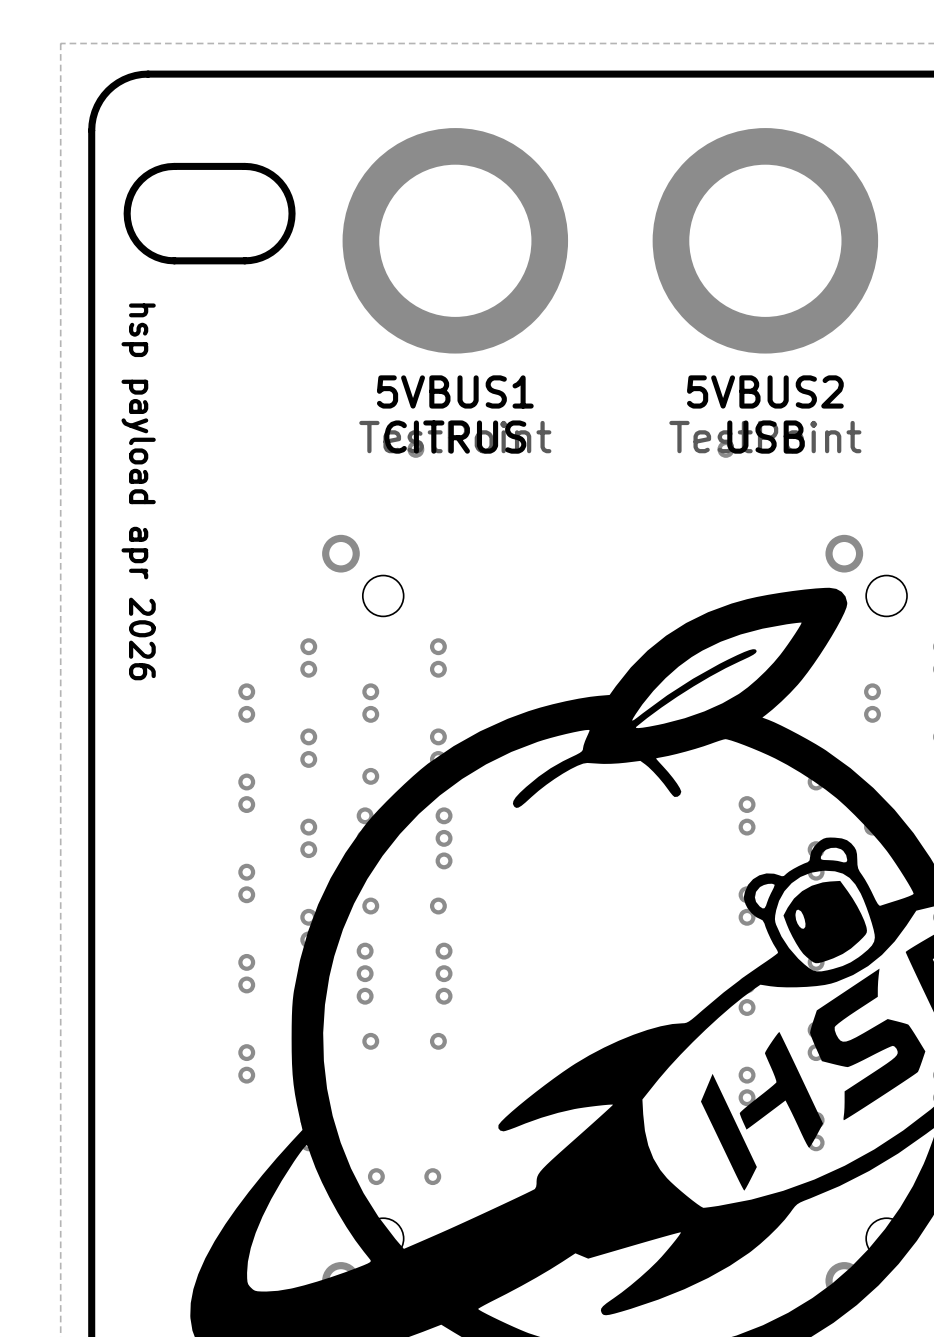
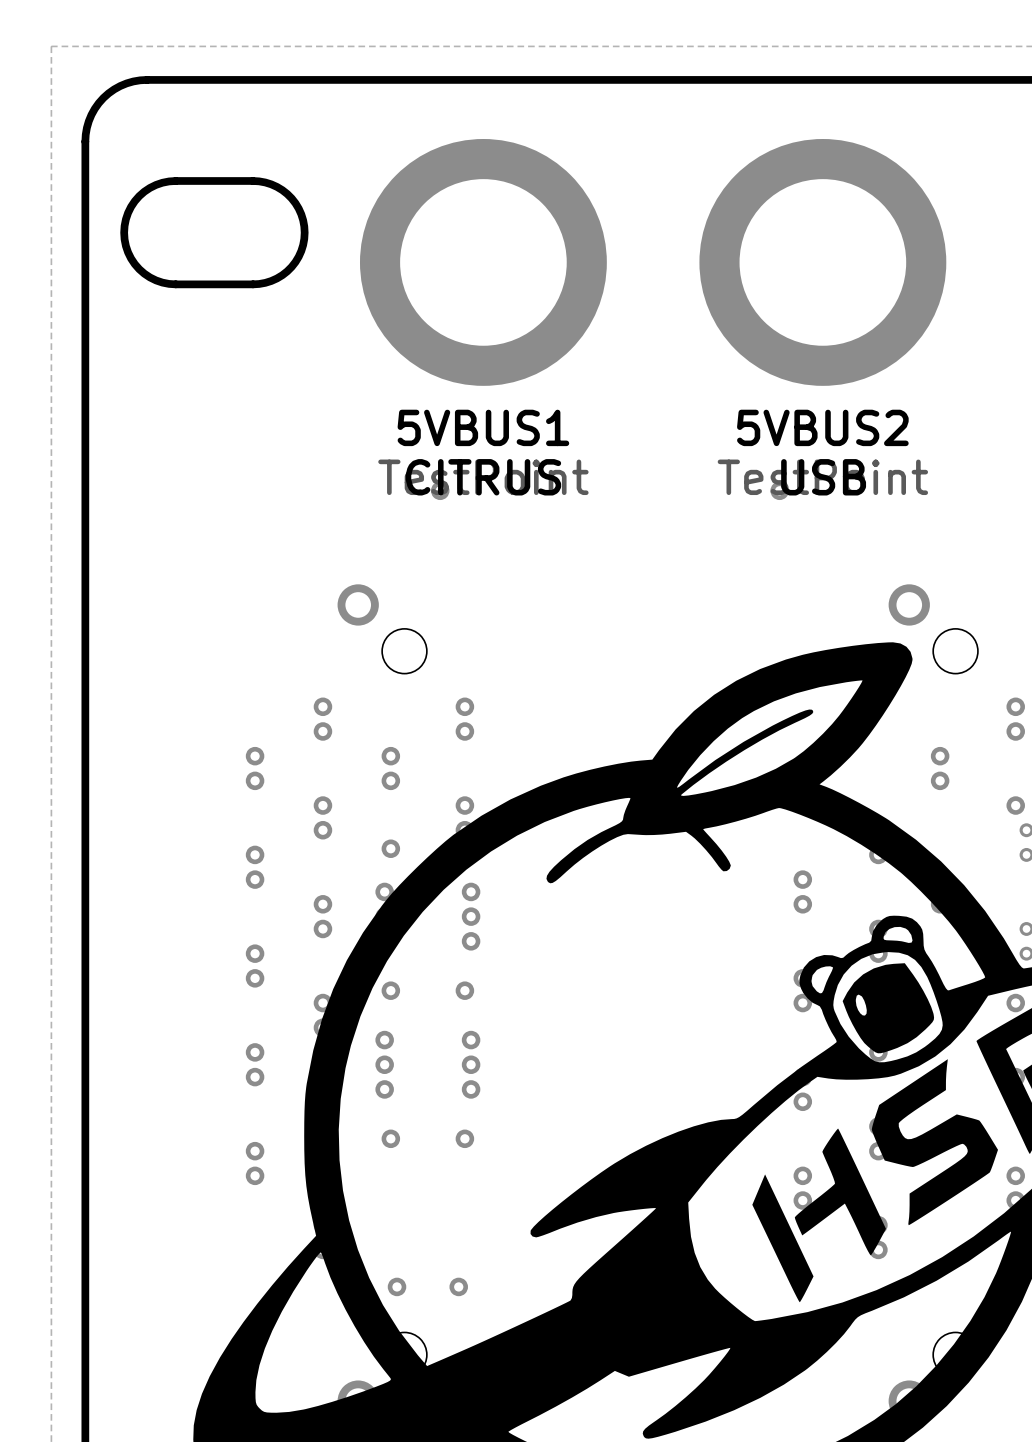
text: hsp payload apr 2026 (138, 491) -> none

